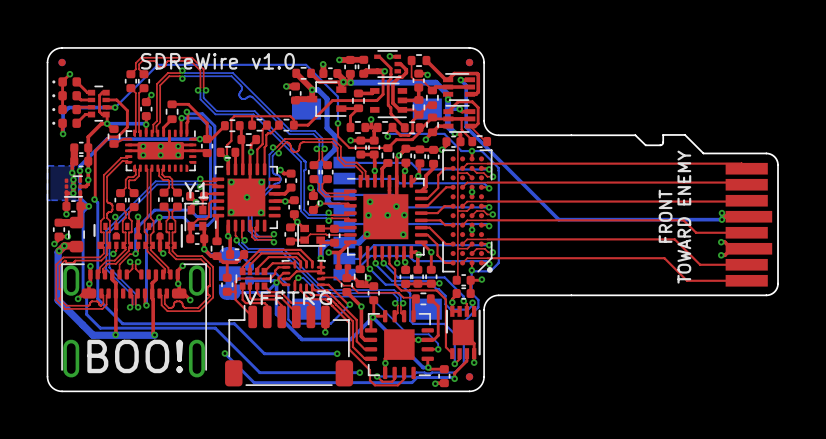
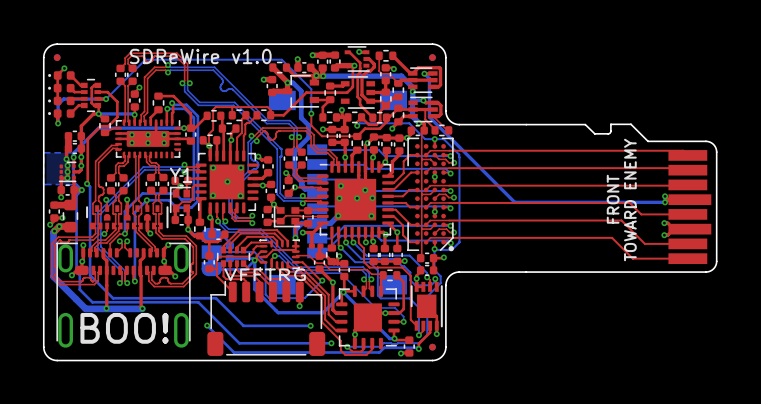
top track: (448, 111) (458, 101) (472, 101) (478, 107) (478, 123) (475, 126) -> (433, 102) (438, 102) (440, 105) (440, 114) (438, 116)

